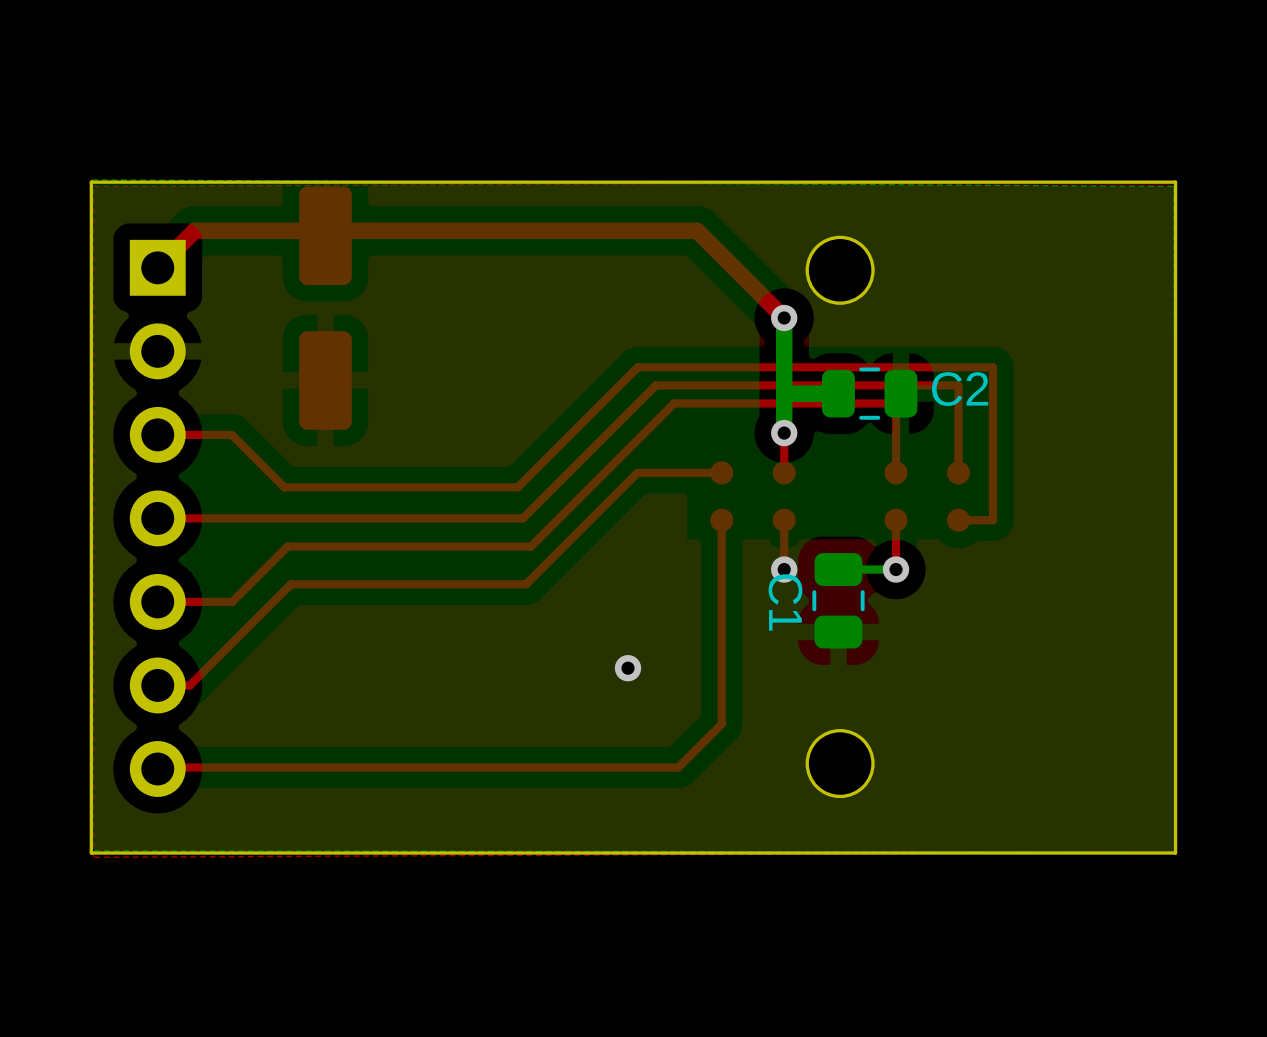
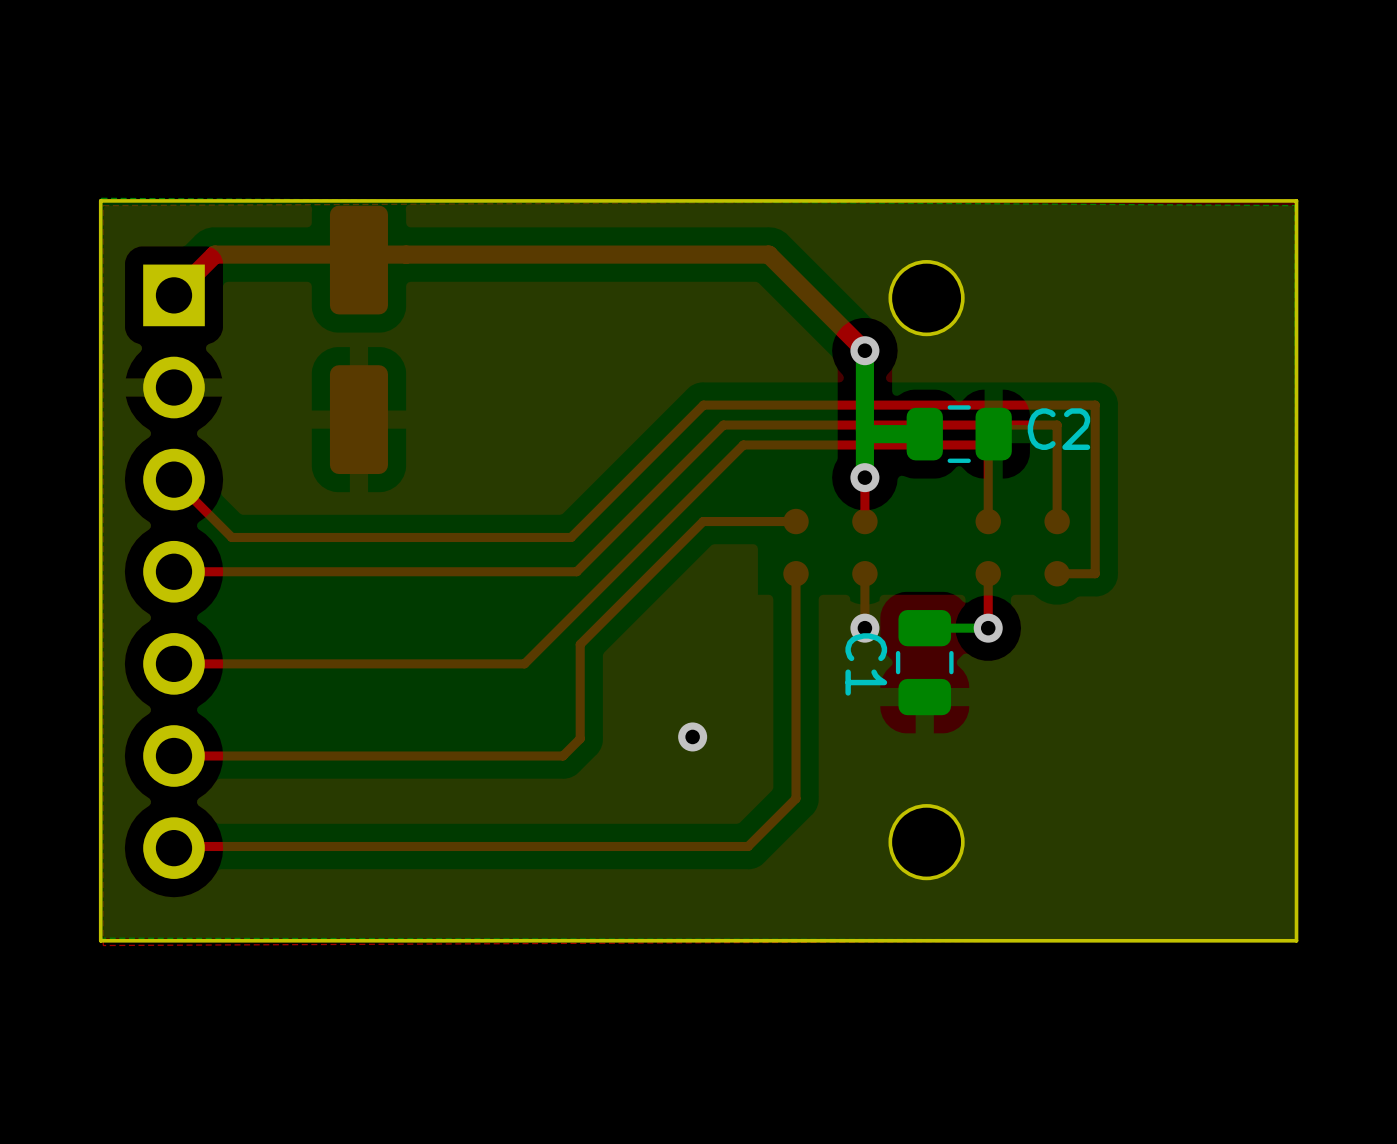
top track: (157, 434) (231, 434) (284, 487) -> (173, 479) (231, 537) (313, 537)
top track: (531, 546) (287, 546) (232, 601) -> (585, 602) (524, 663) (256, 663)
top track: (526, 584) (290, 584) (189, 685) -> (580, 644) (580, 738) (562, 756) (209, 756)

